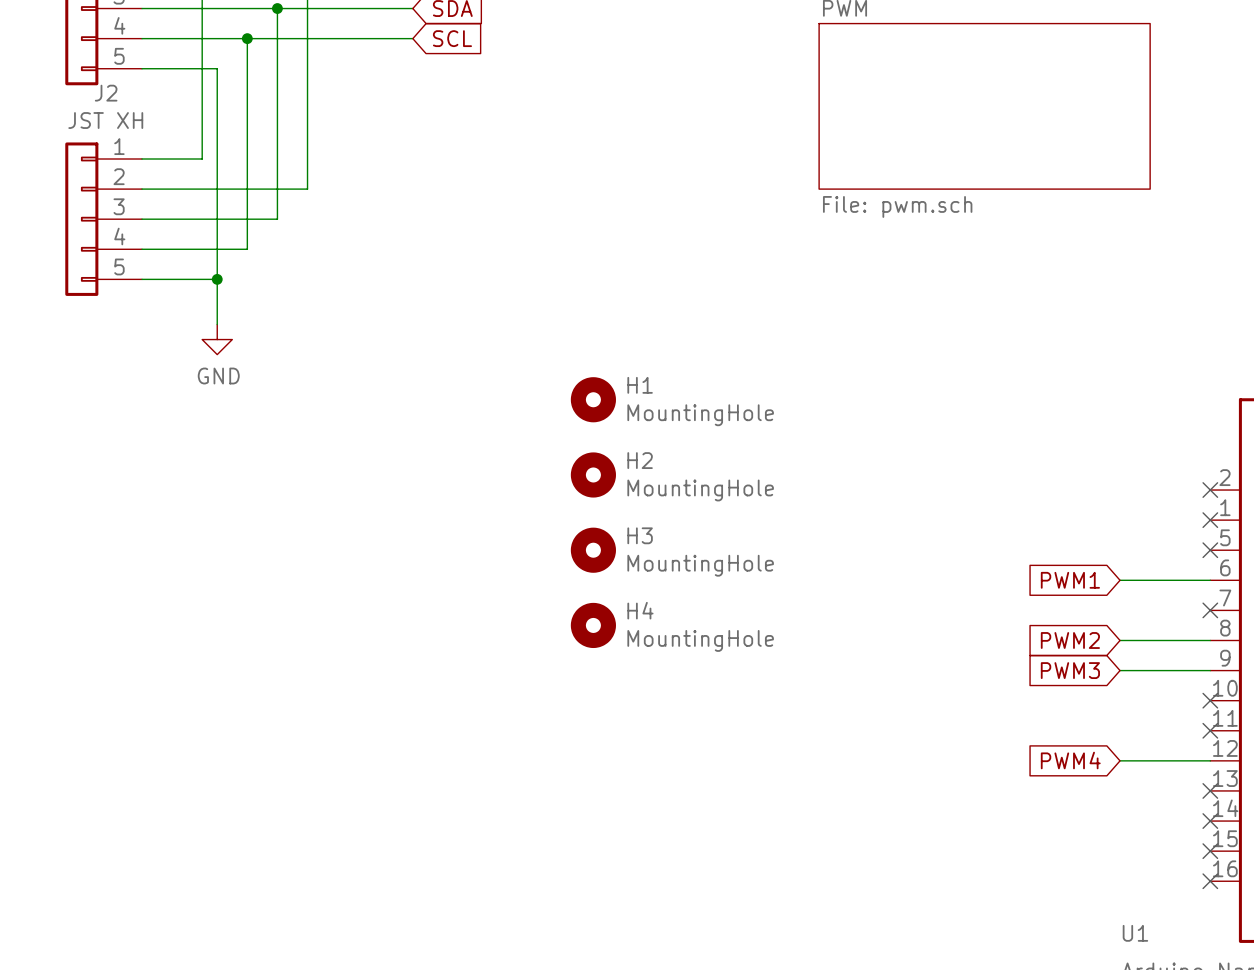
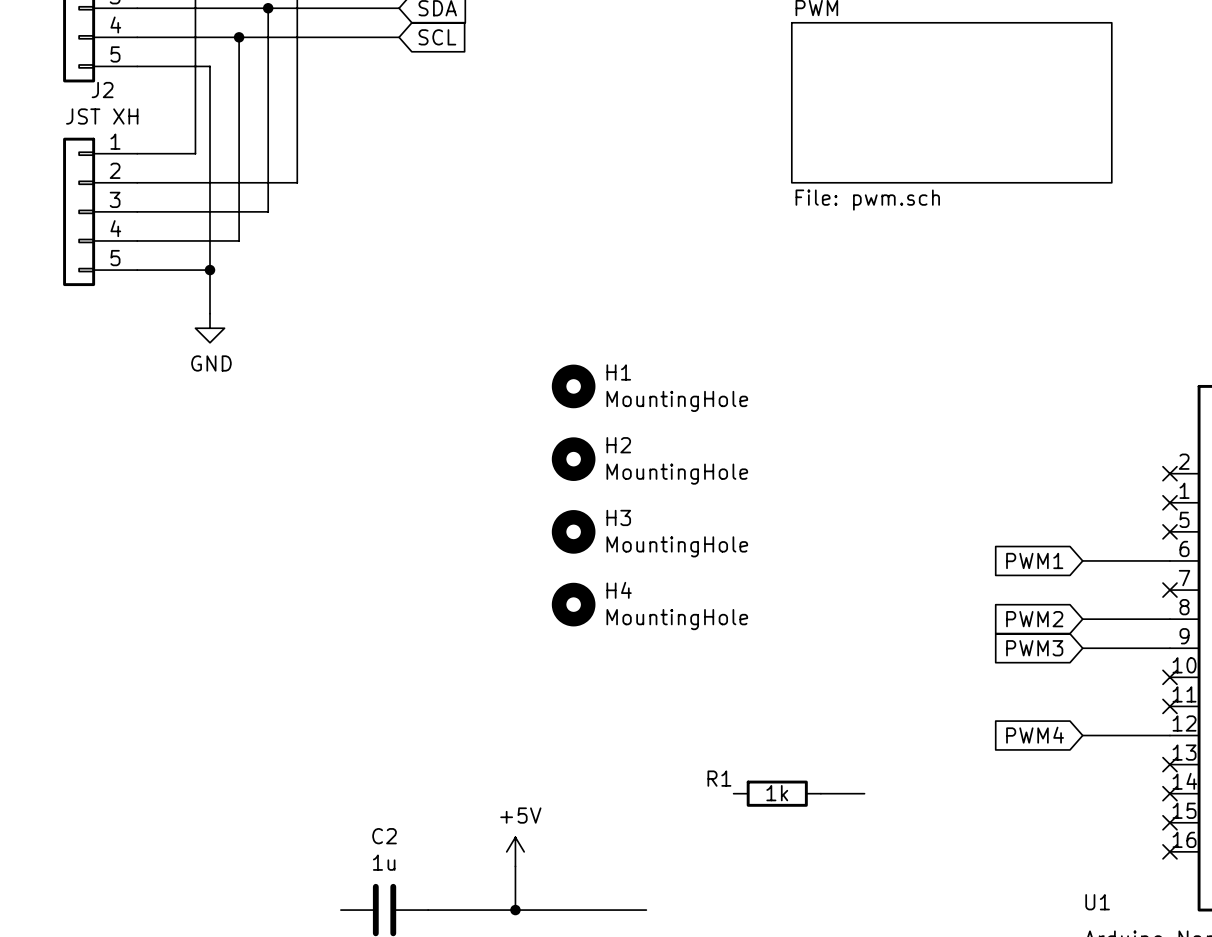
R1: none -> 1k (777, 793)
wire: none -> (820, 793) (864, 793)
power symbol: none -> +5V (515, 851)
wire: none -> (515, 866) (515, 910)
C2: none -> 1u (384, 910)
wire: none -> (428, 910) (646, 910)
junction: none -> (515, 910)

